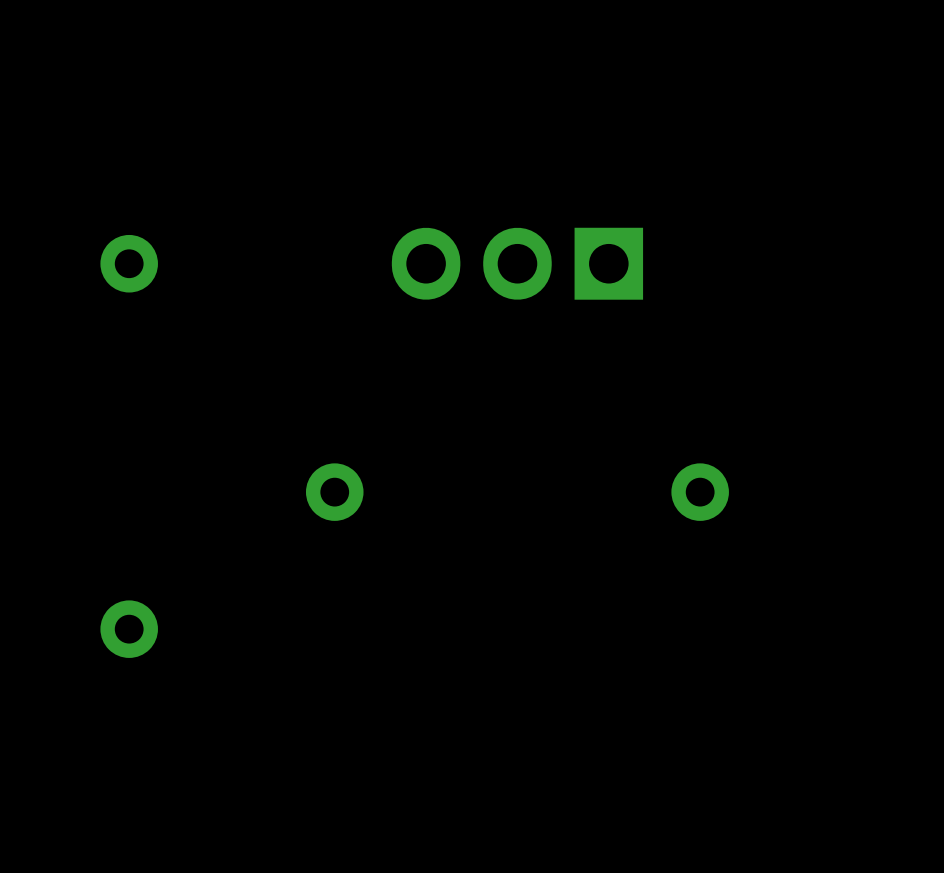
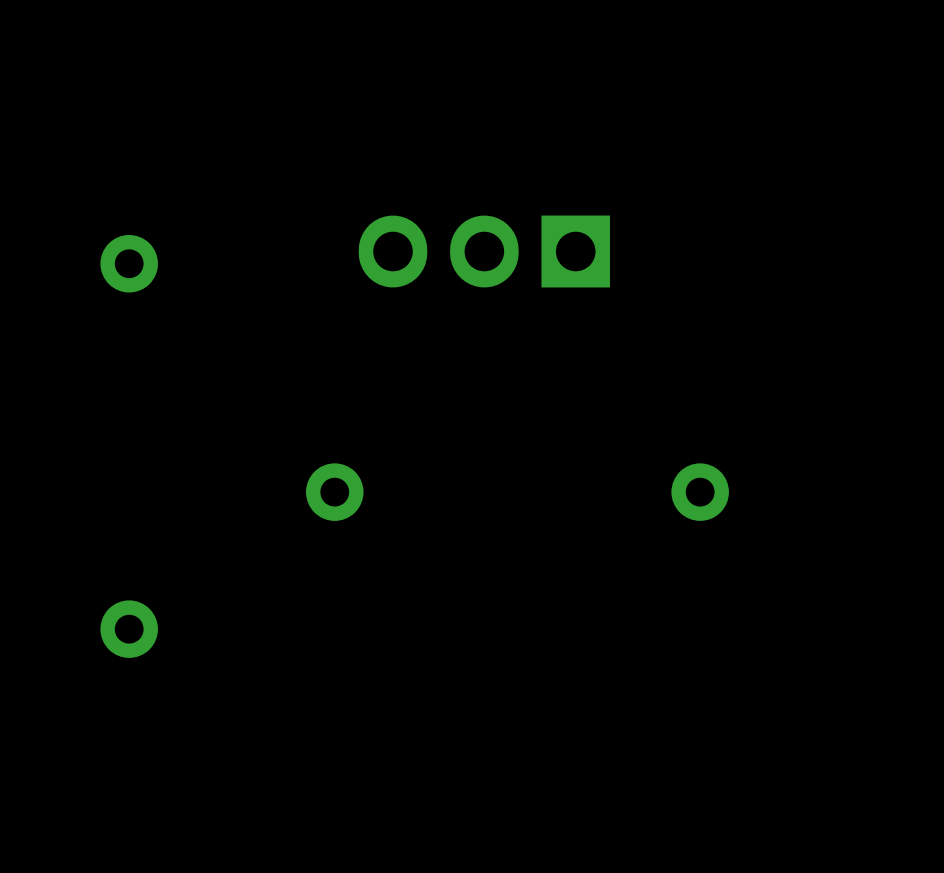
part position: (517, 263) -> (484, 251)

